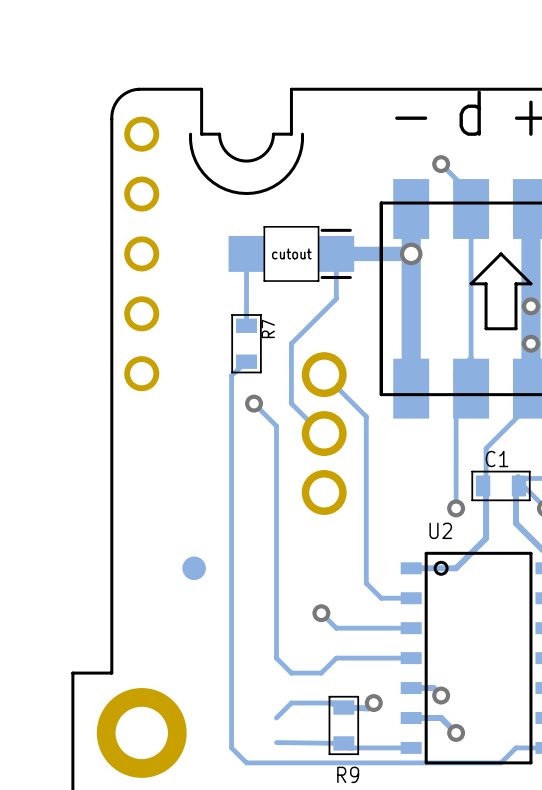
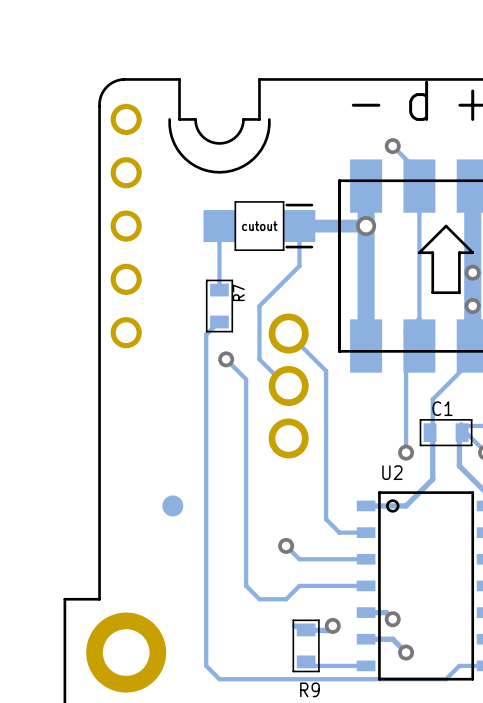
track: (330, 703) (291, 703) (276, 717) -> none
track: (276, 742) (343, 743) -> none

